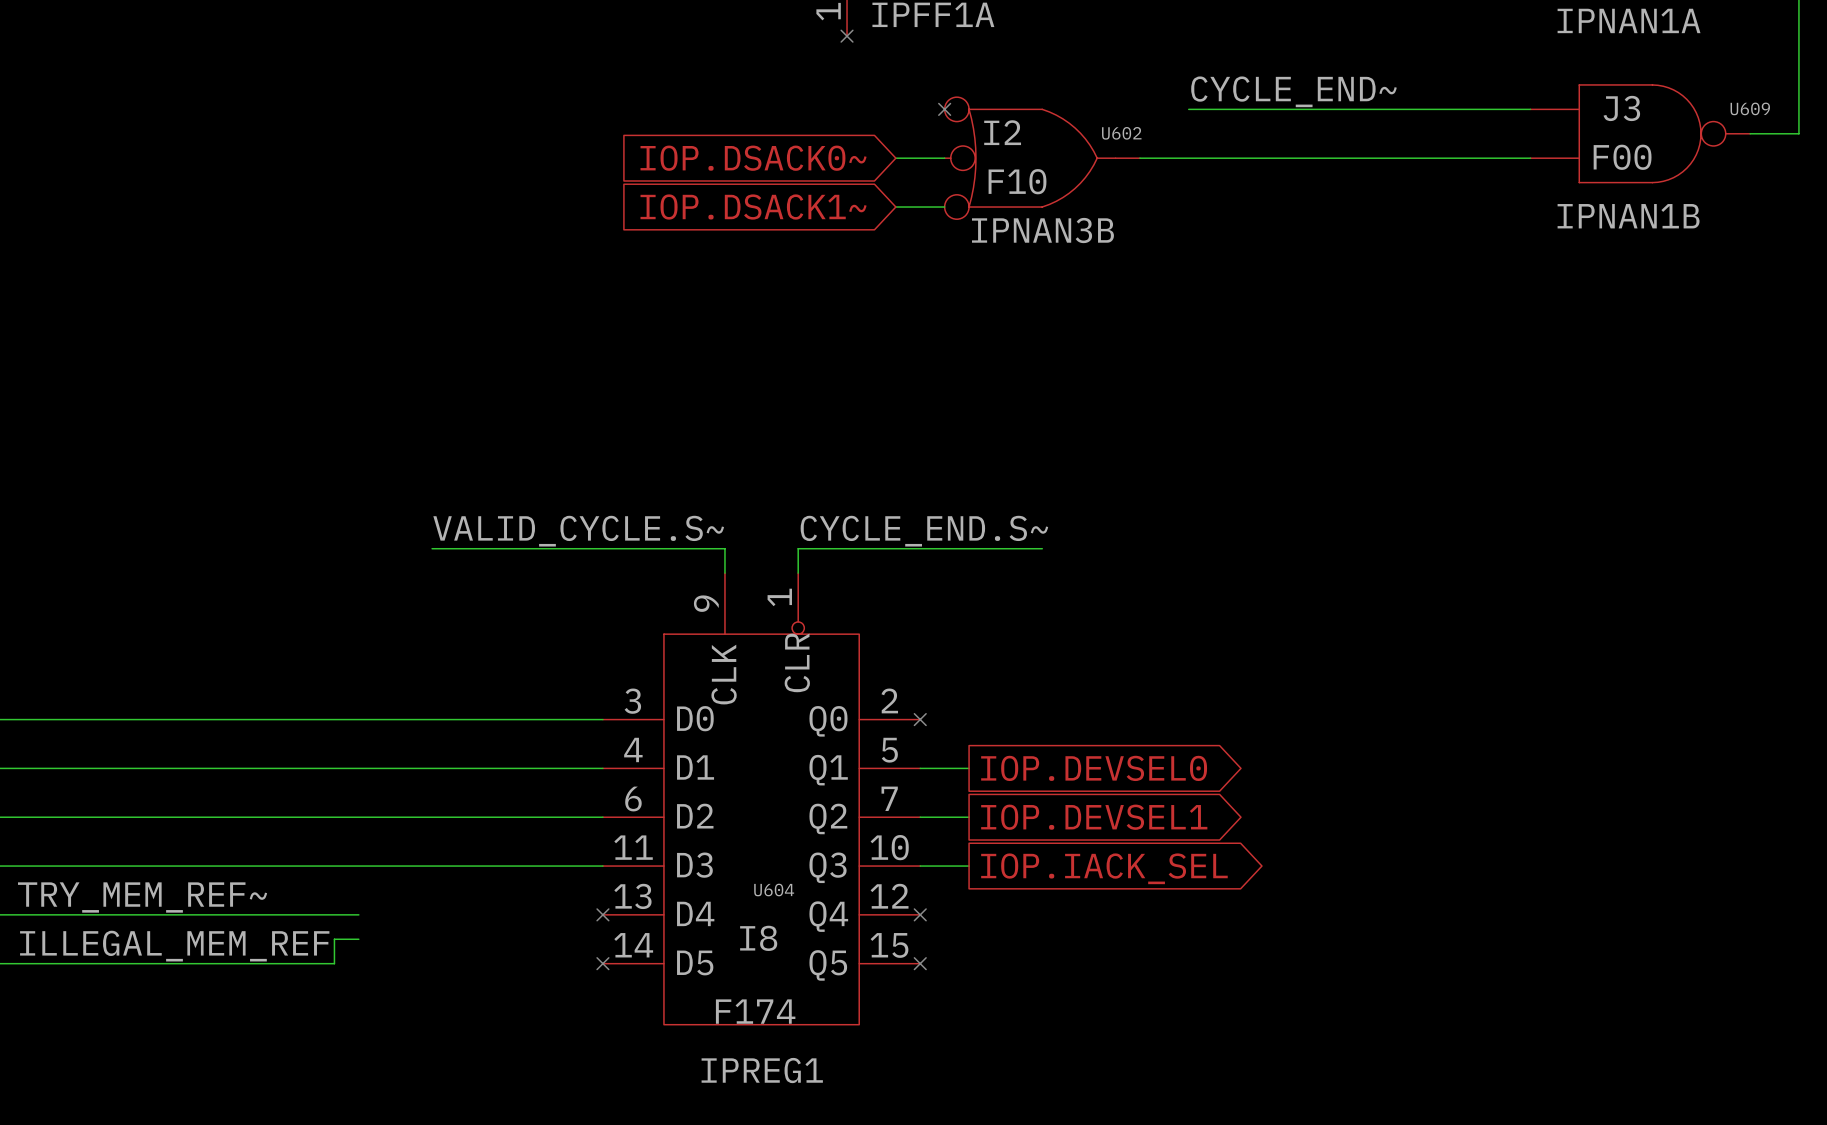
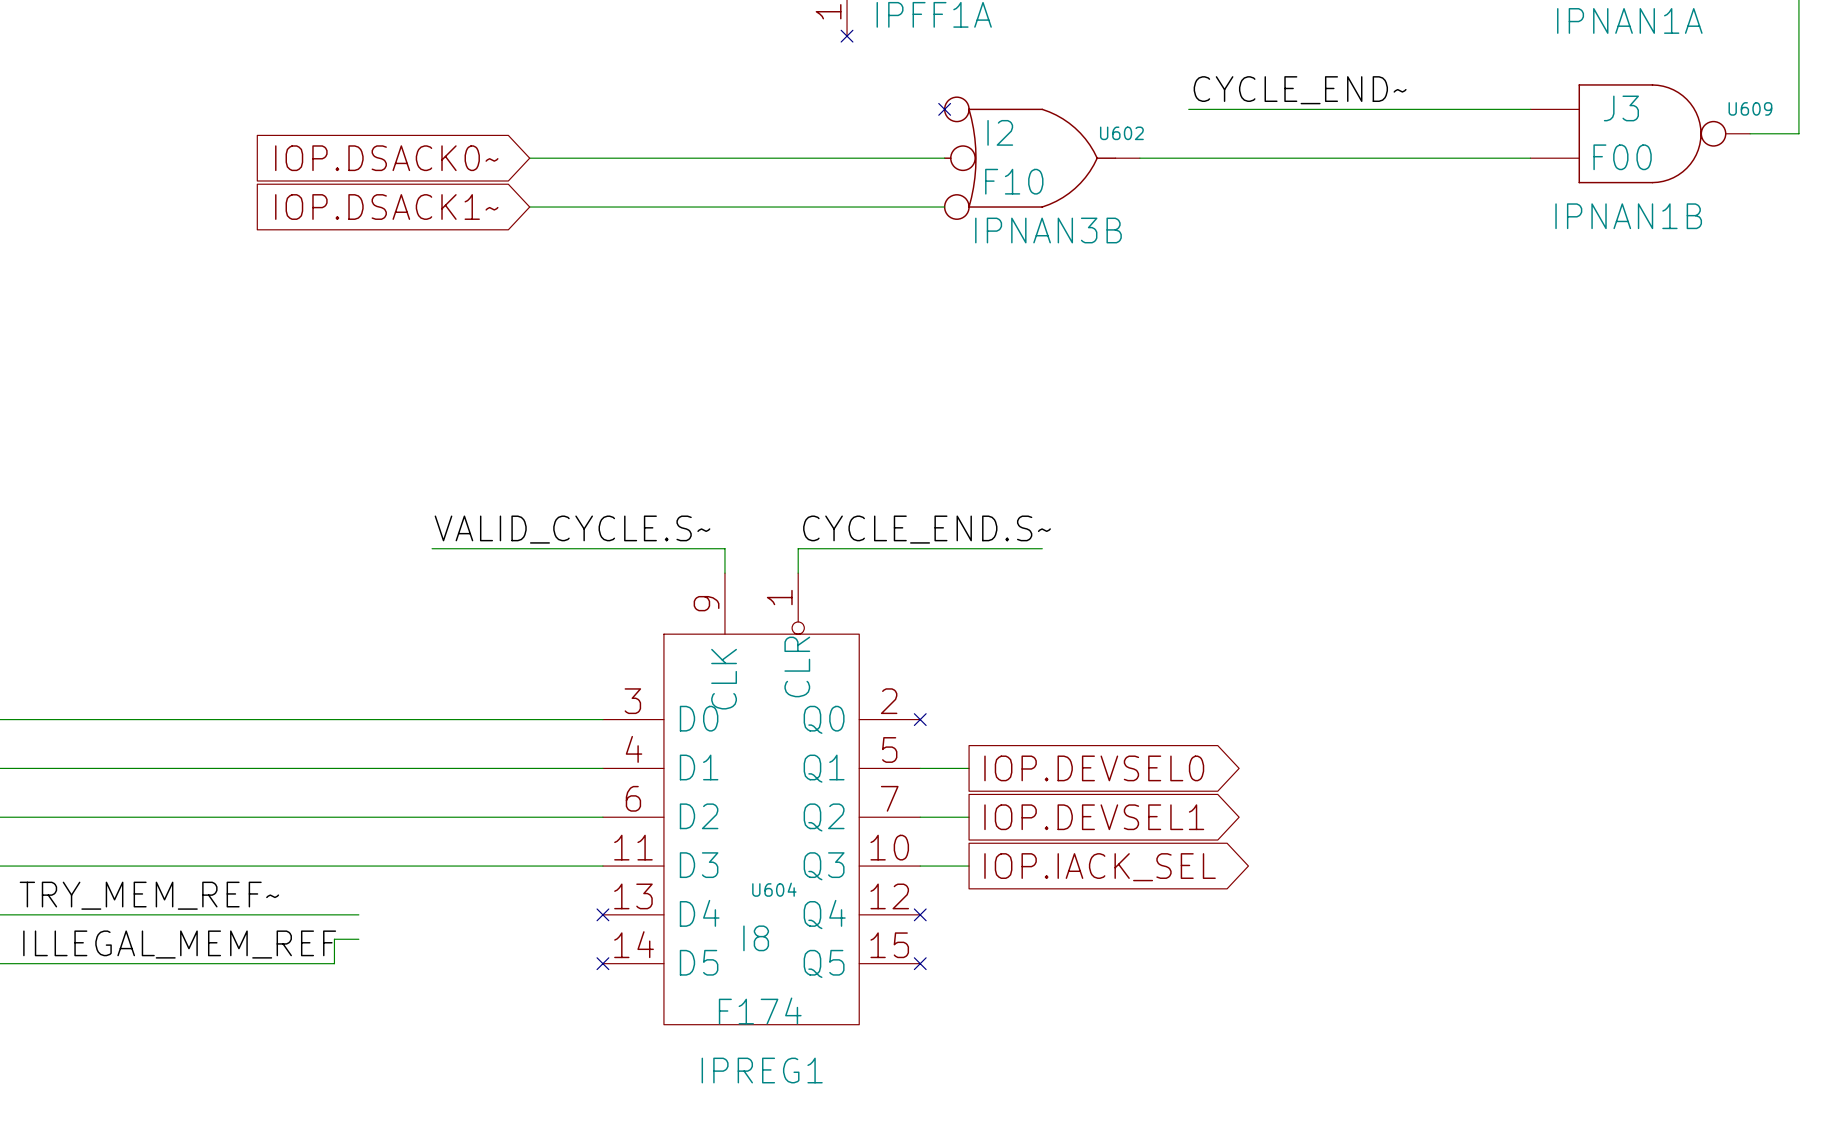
global label: none -> IOP.DSACK0~ (386, 158)
wire: none -> (529, 158) (895, 158)
global label: IOP.DSACK0~ (753, 158) -> none
global label: none -> IOP.DSACK1~ (386, 207)
wire: none -> (529, 207) (895, 207)
global label: IOP.DSACK1~ (753, 207) -> none

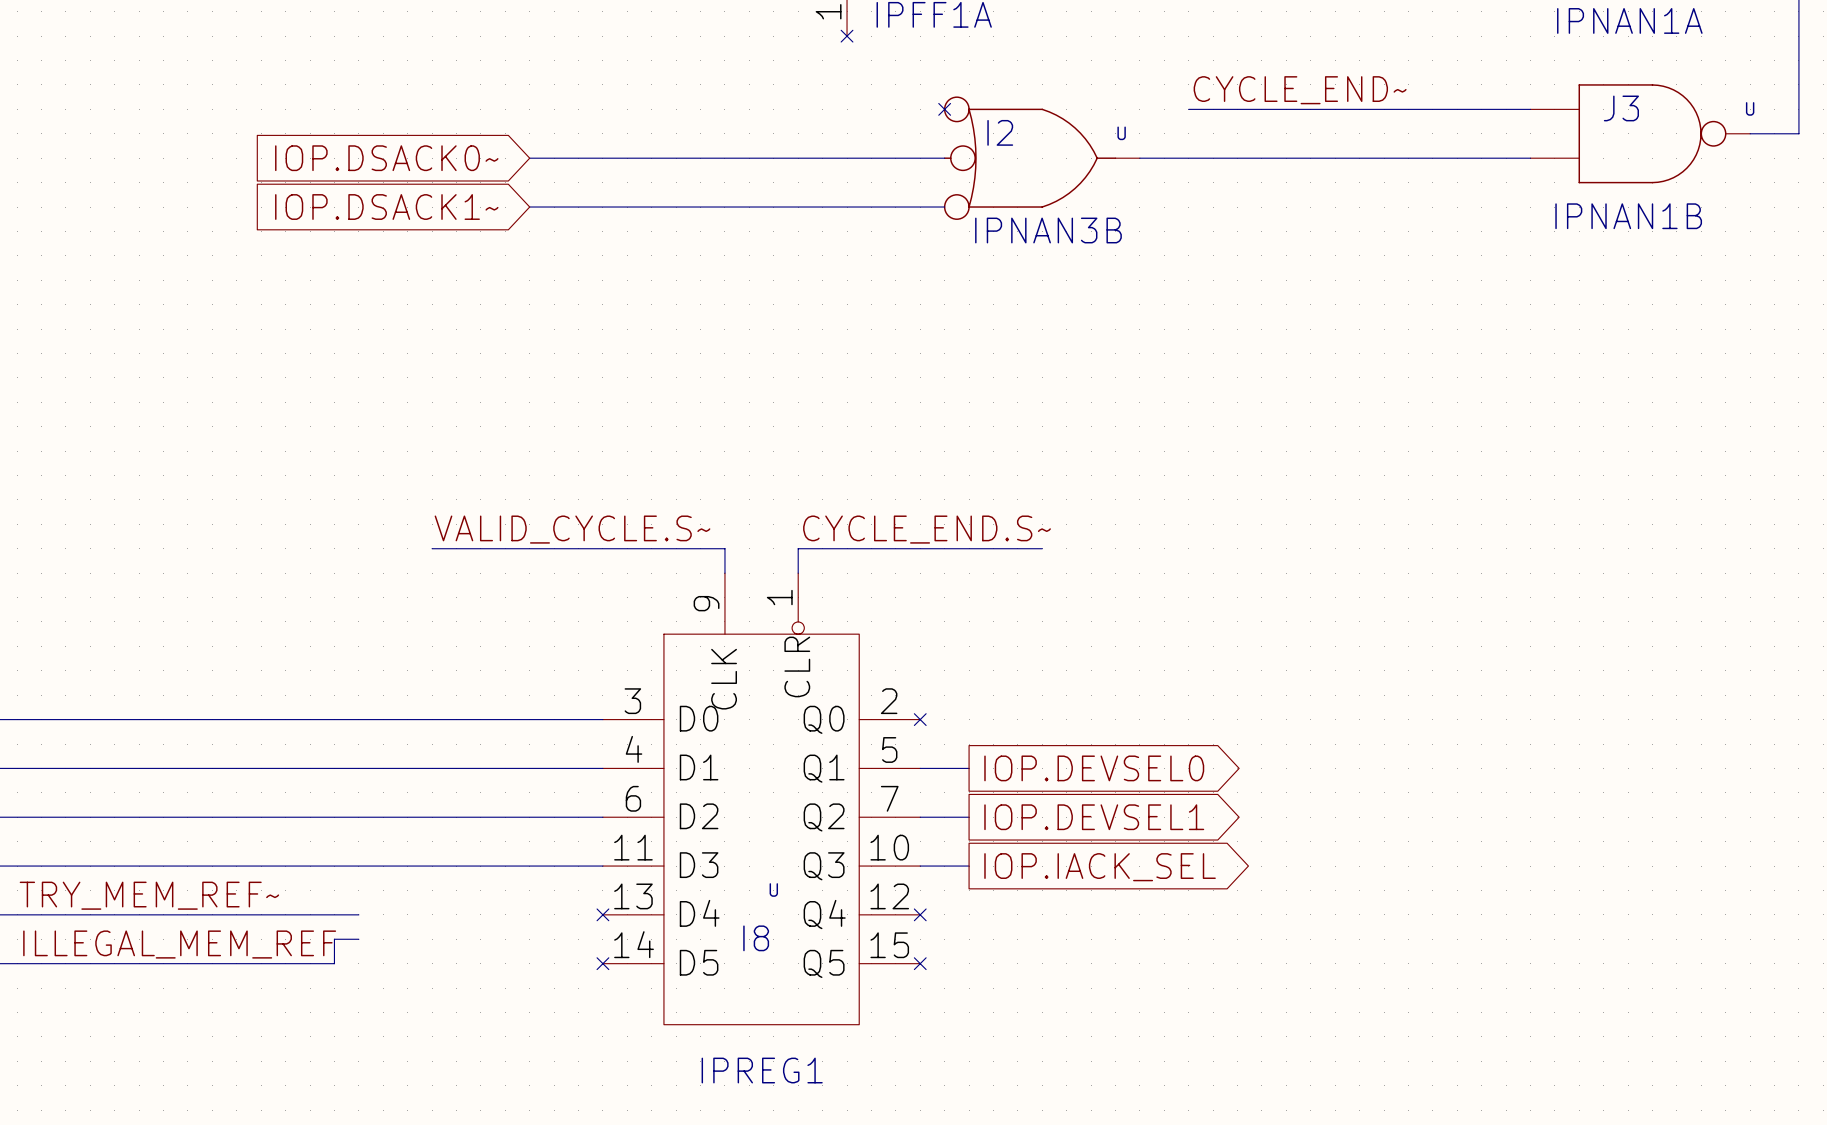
U609 name: U609 (1750, 108) -> U (1750, 108)
U602 name: U602 (1121, 133) -> U (1121, 133)
U609 value: F00 (1622, 157) -> none
U602 value: F10 (1014, 181) -> none
U604 name: U604 (774, 889) -> U (773, 889)
U604 value: F174 (760, 1011) -> none

